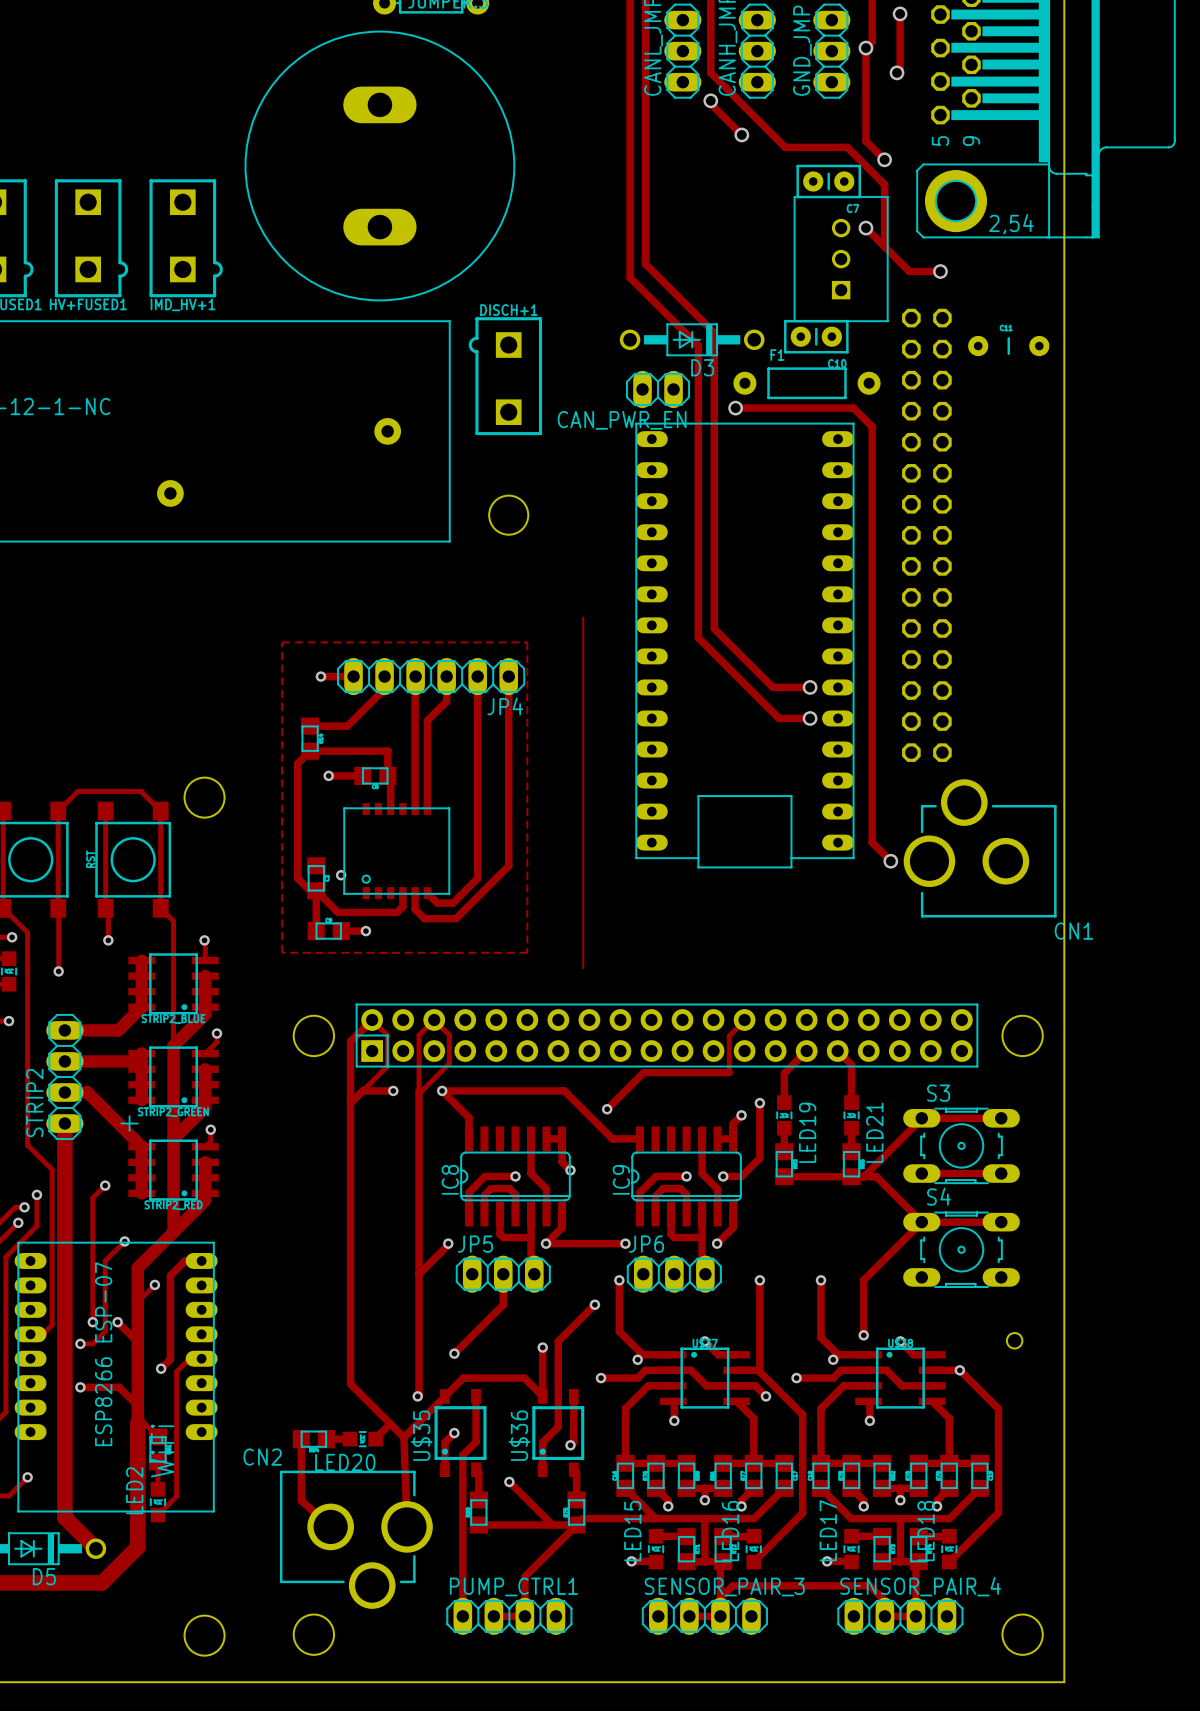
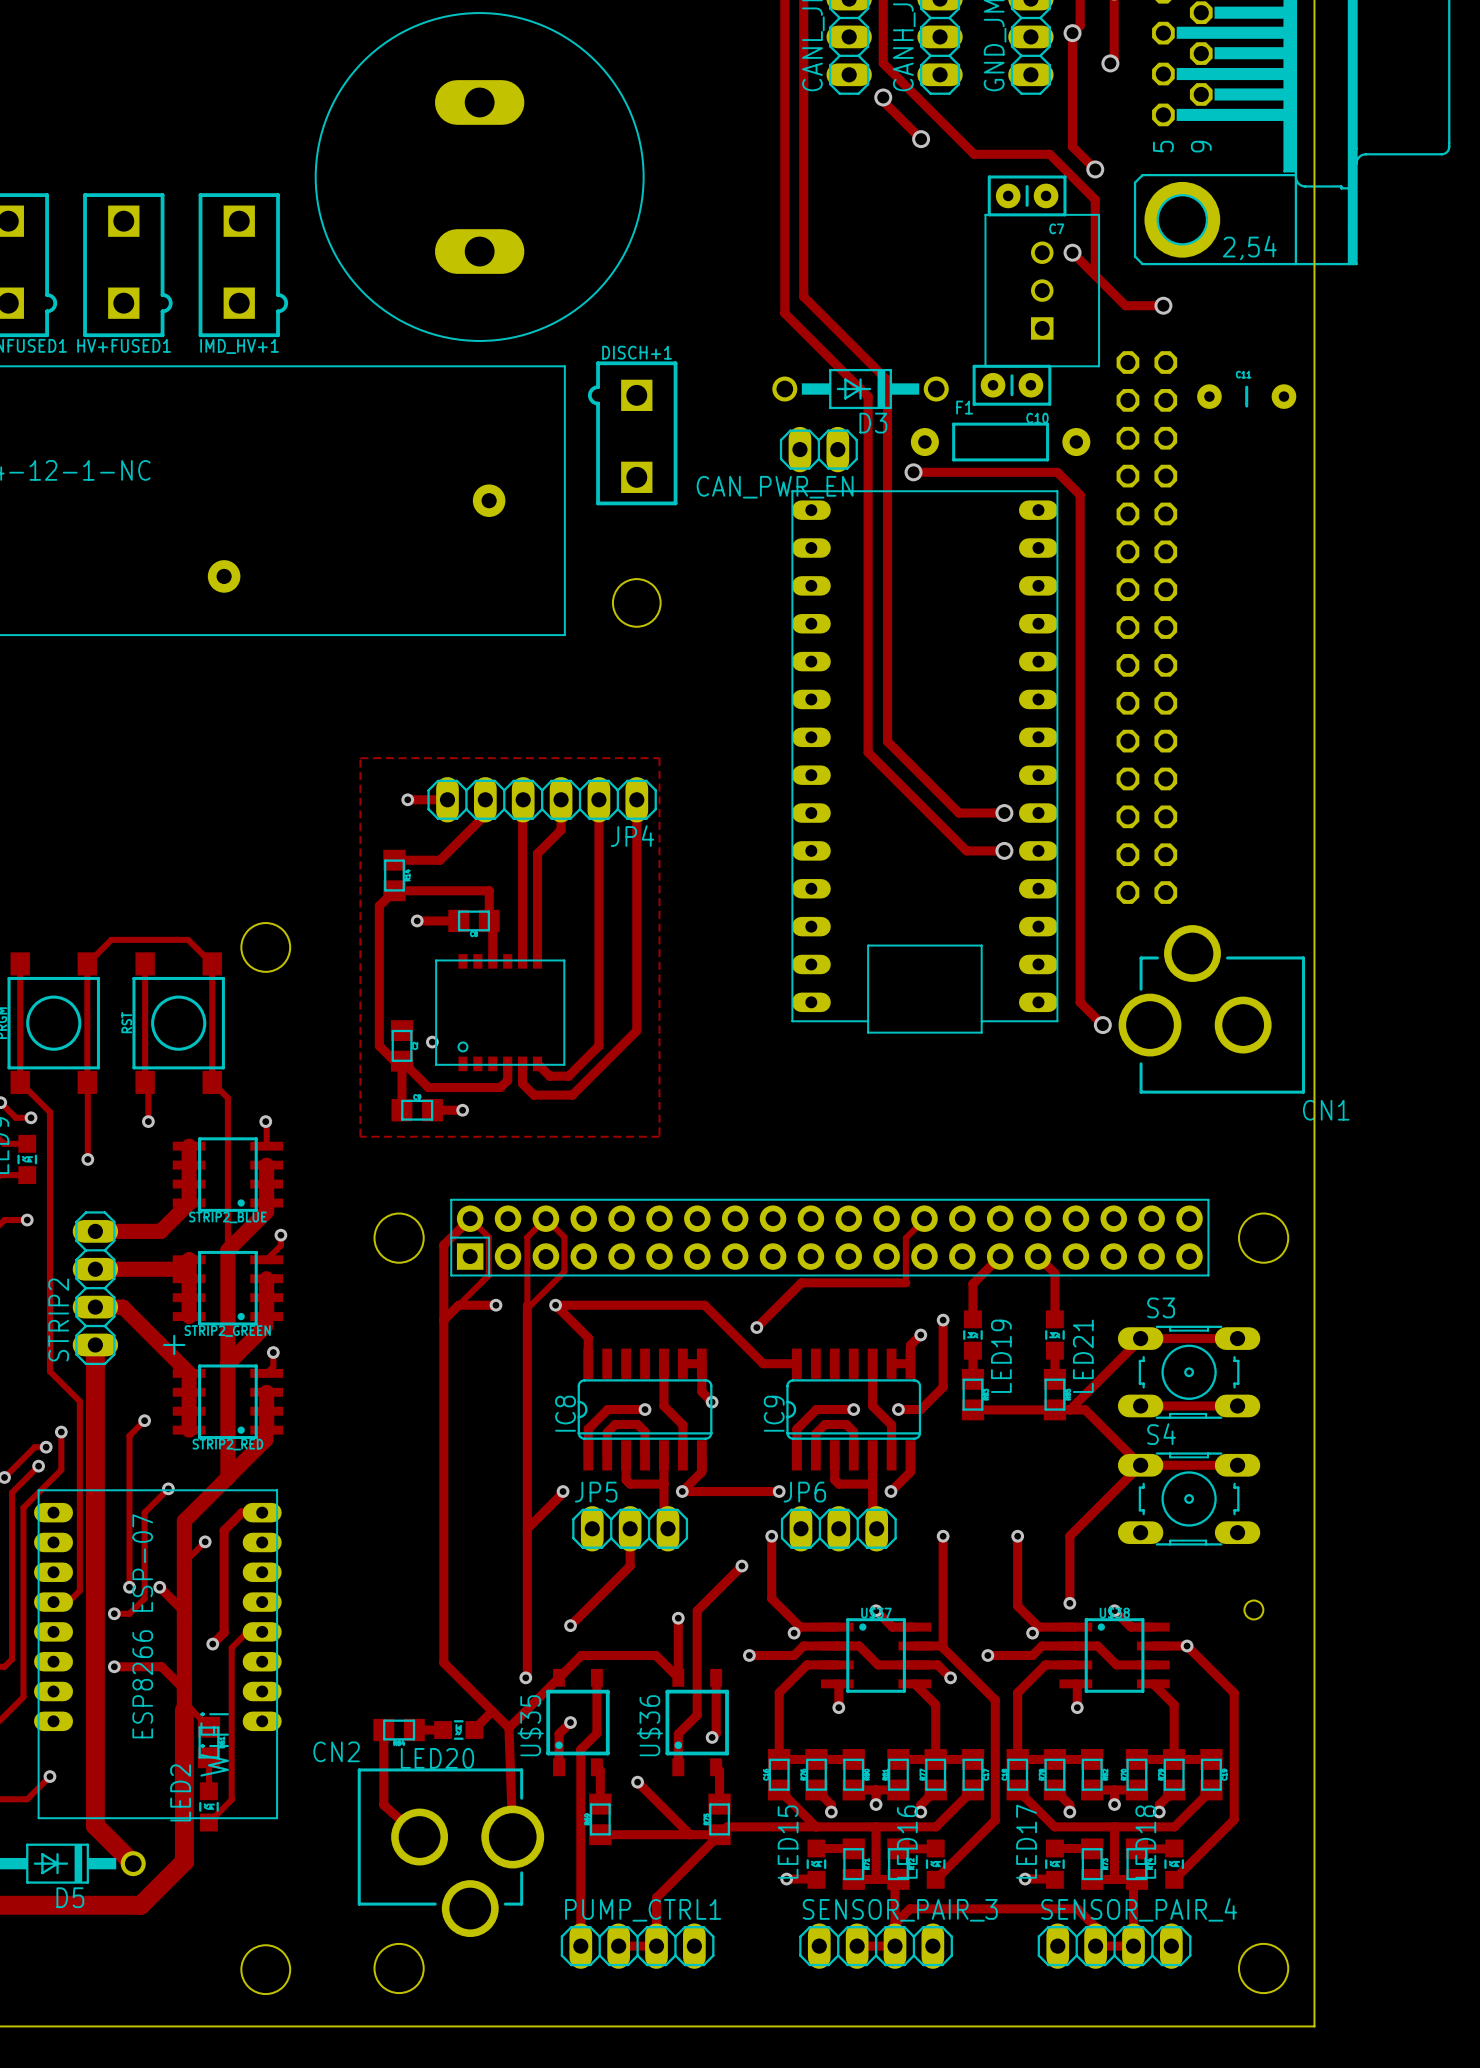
track: (583, 617) (583, 968) -> none

